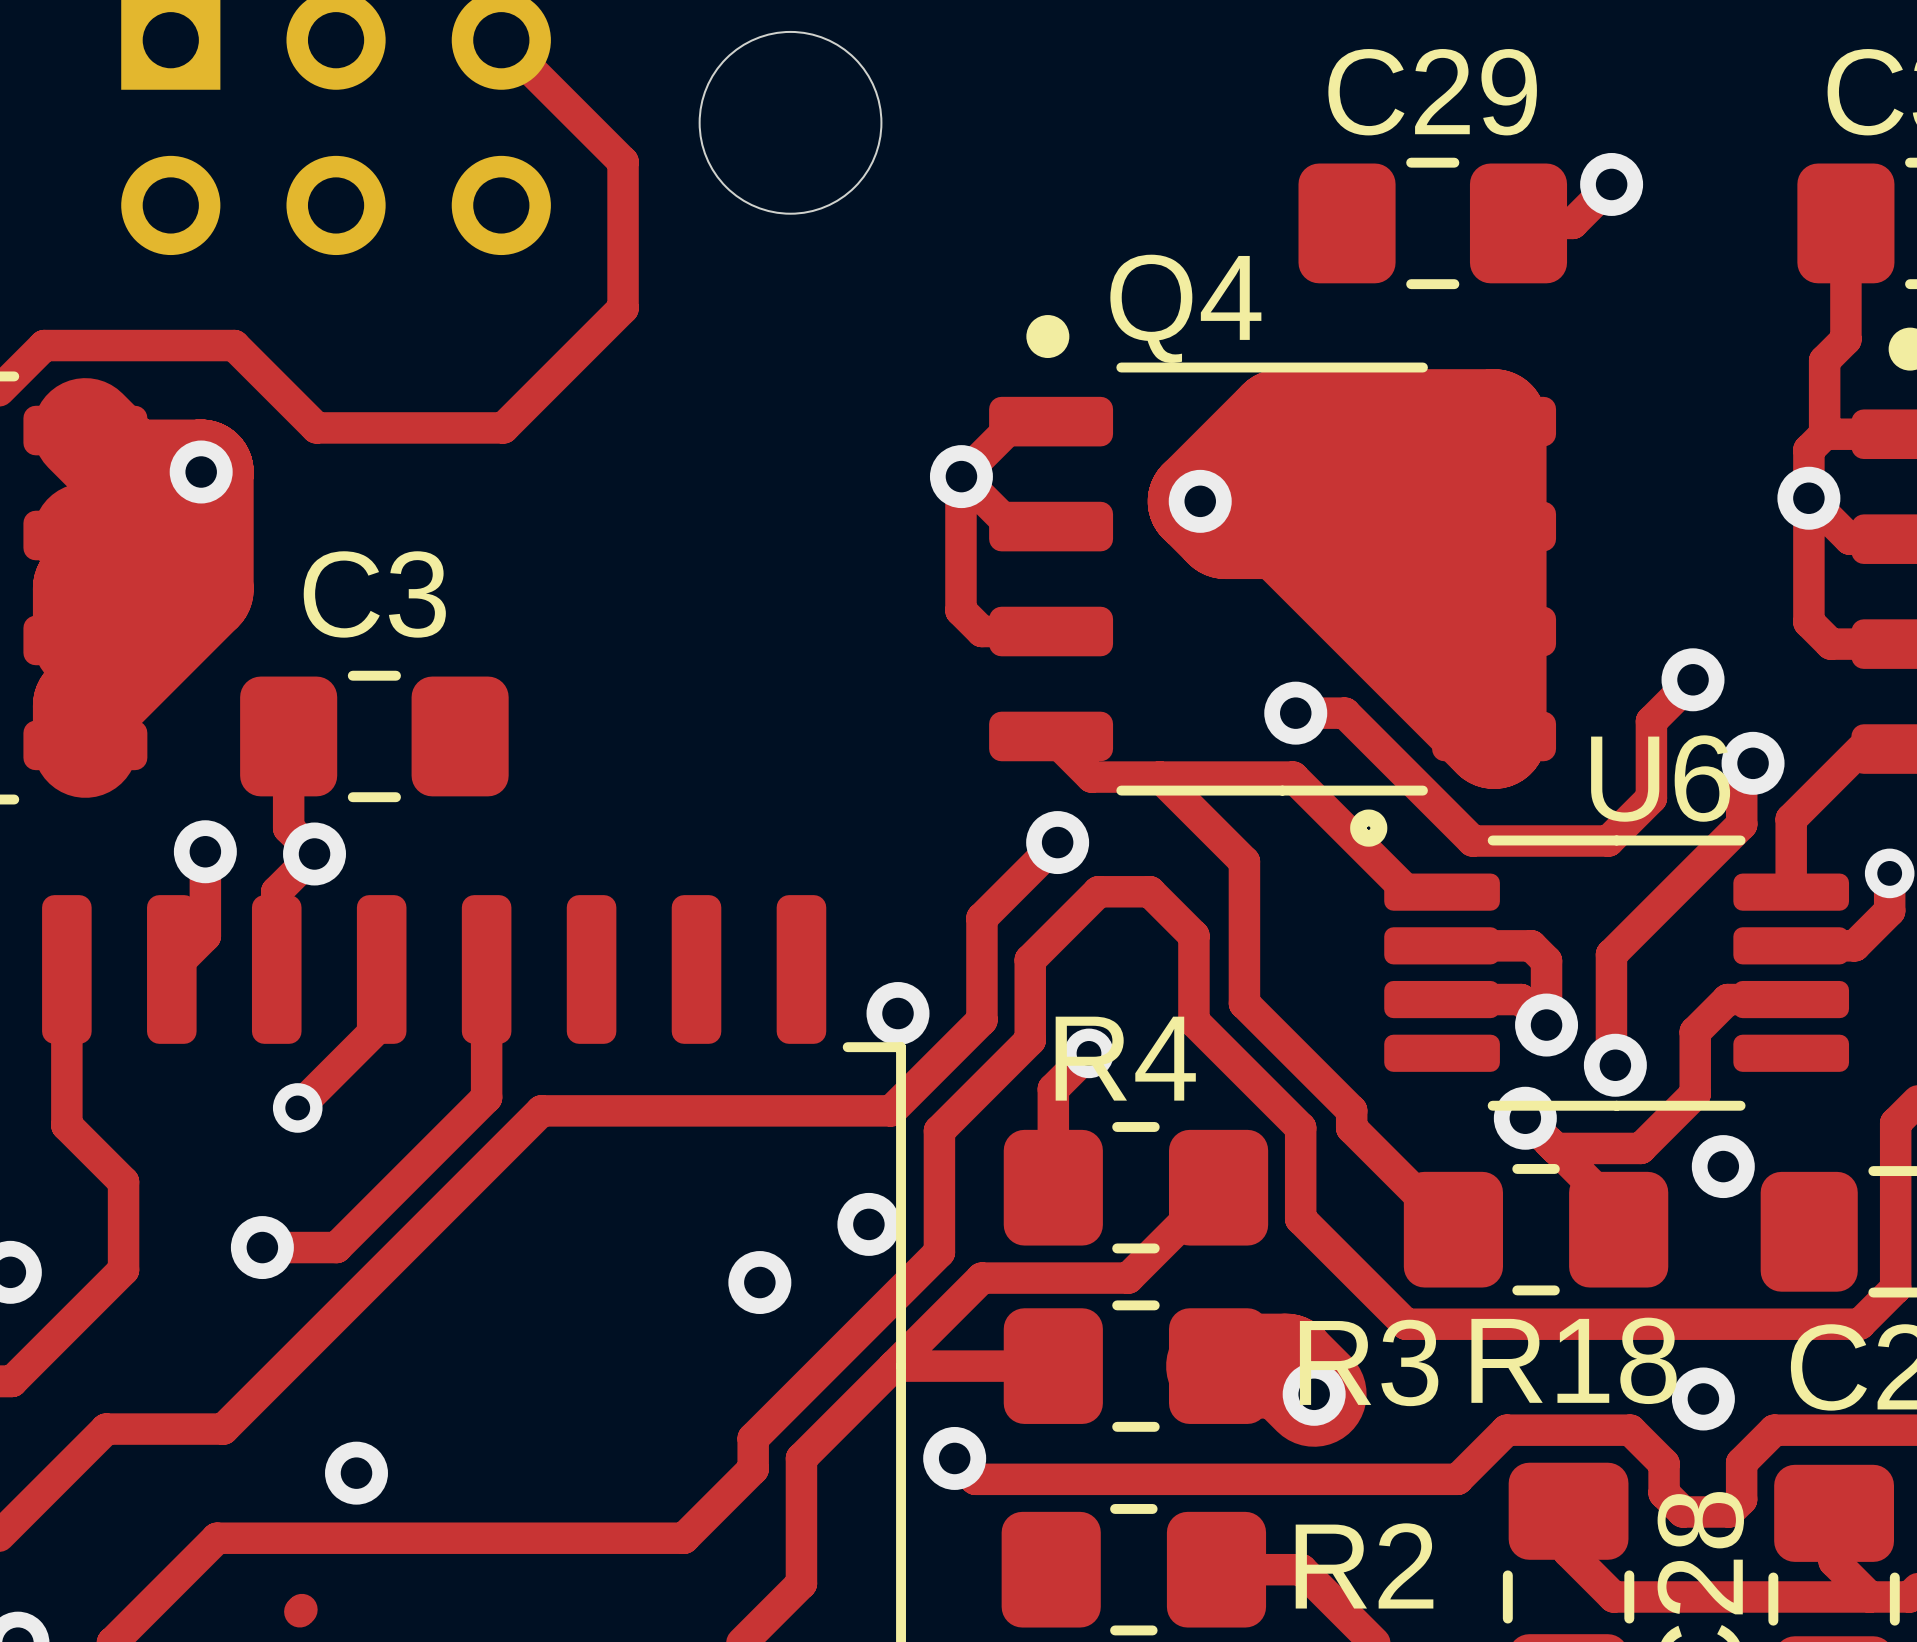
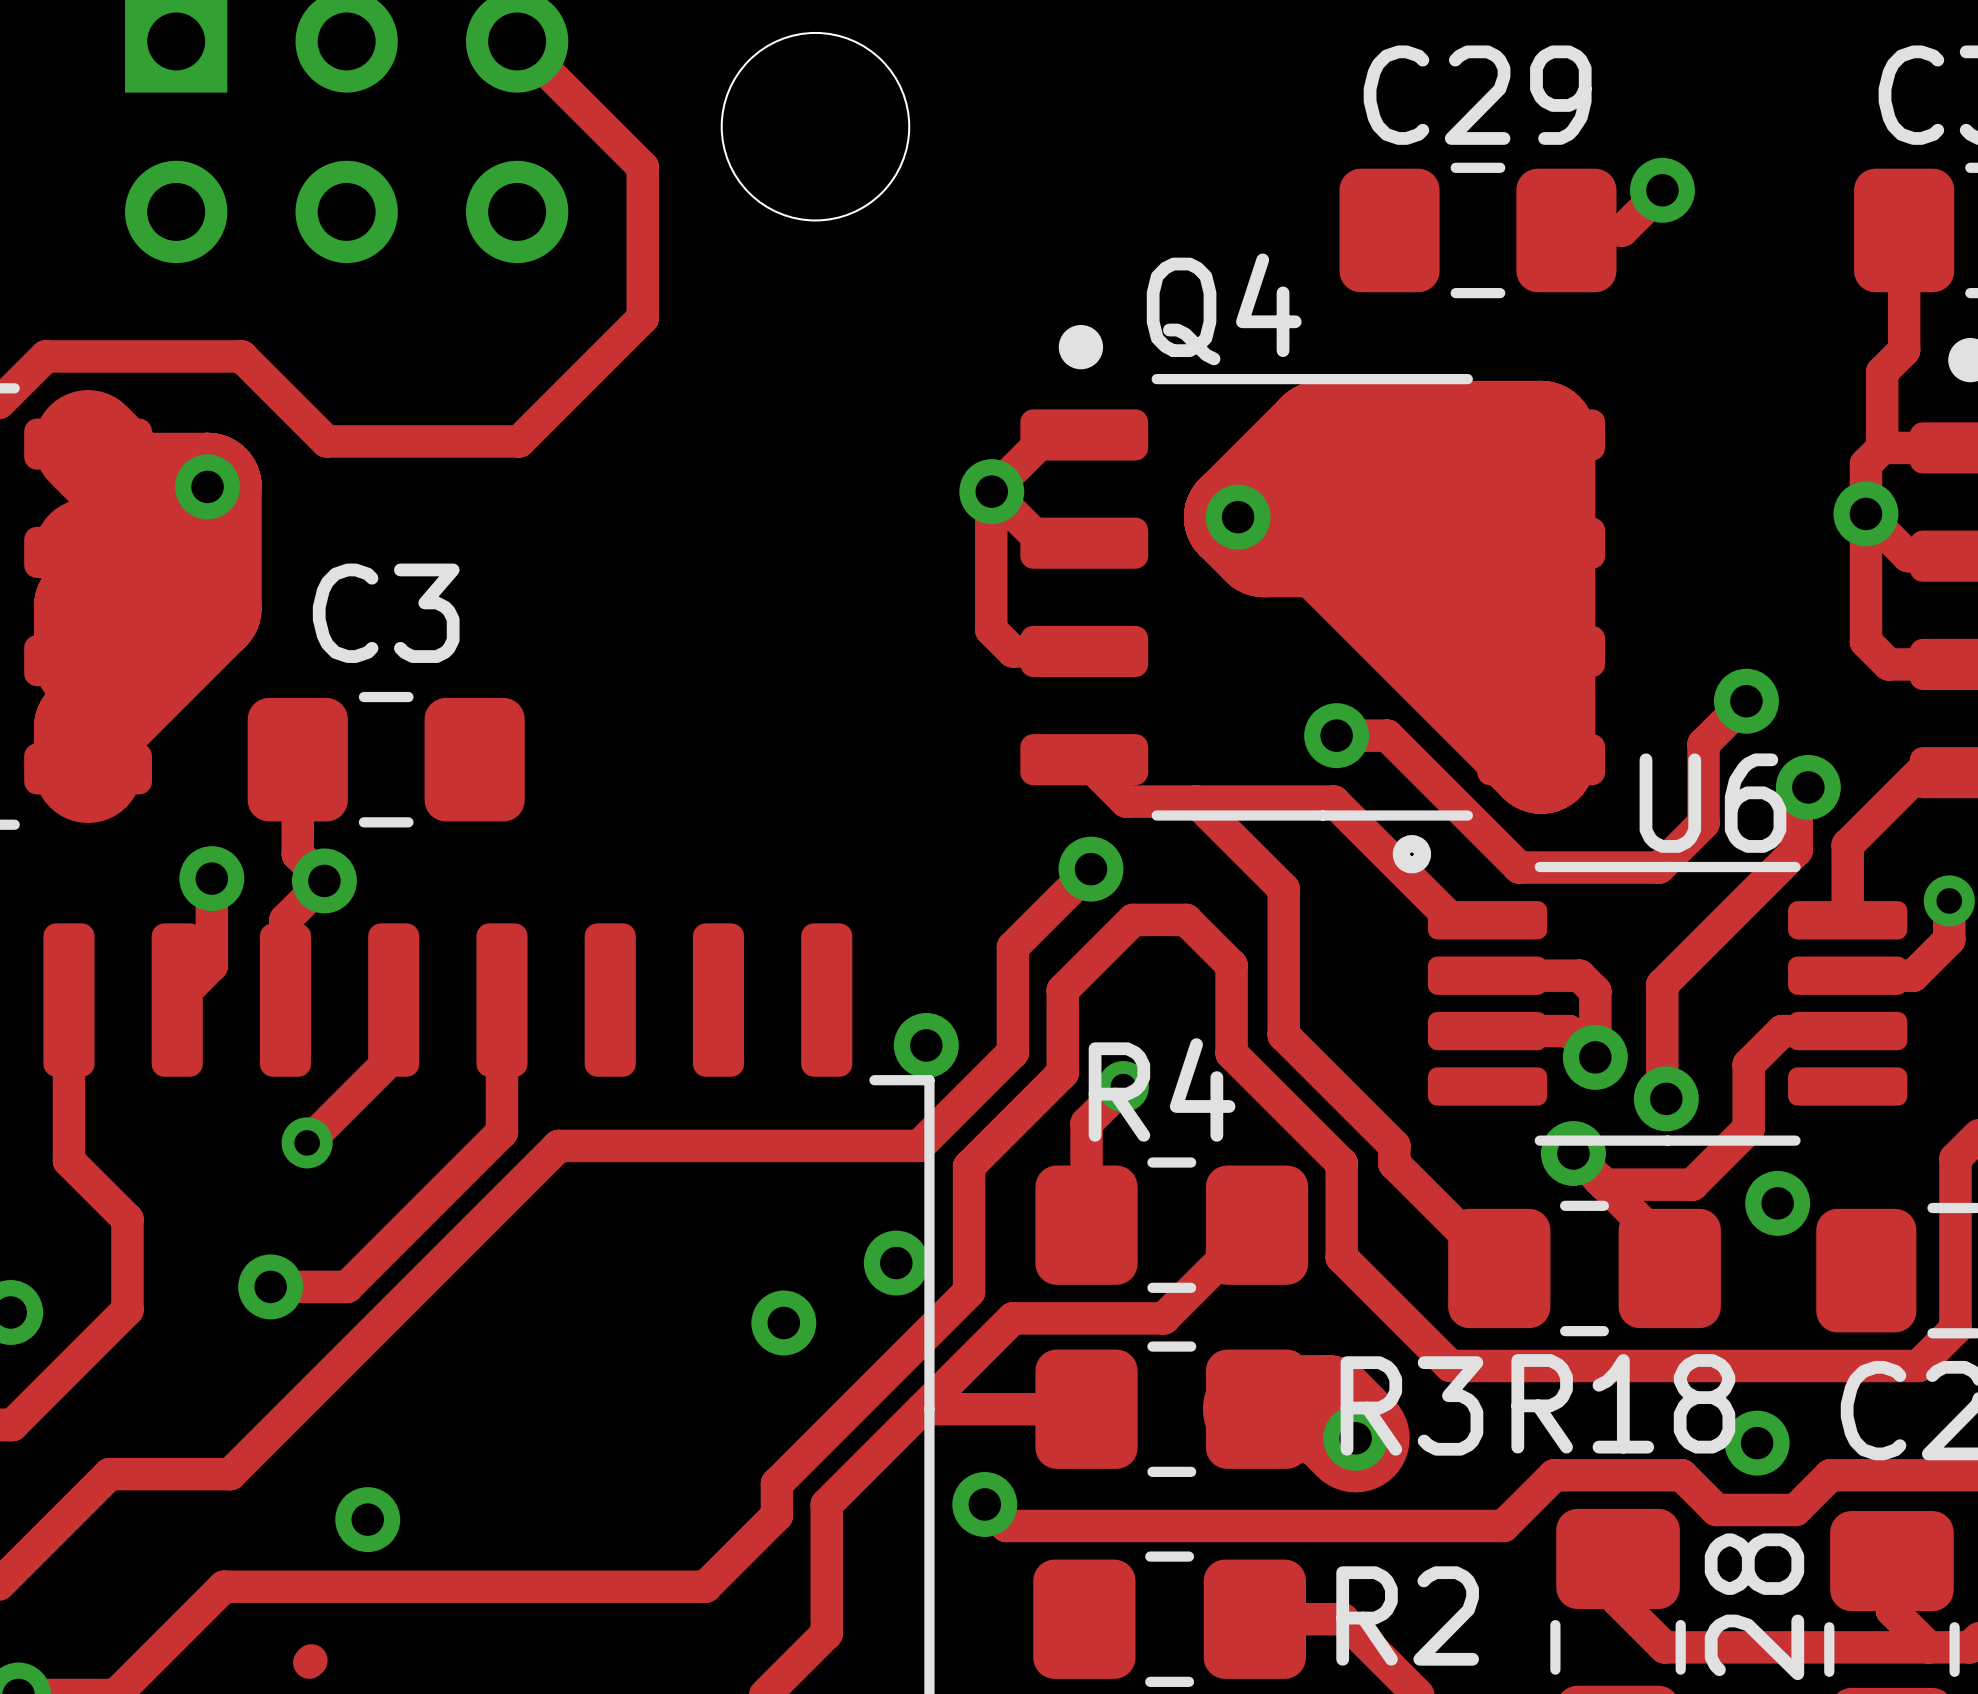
track: (1741, 1462) (1741, 1499) (1729, 1511) (1682, 1511) (1664, 1493) (1664, 1463) -> (1795, 1510) (1716, 1510)

